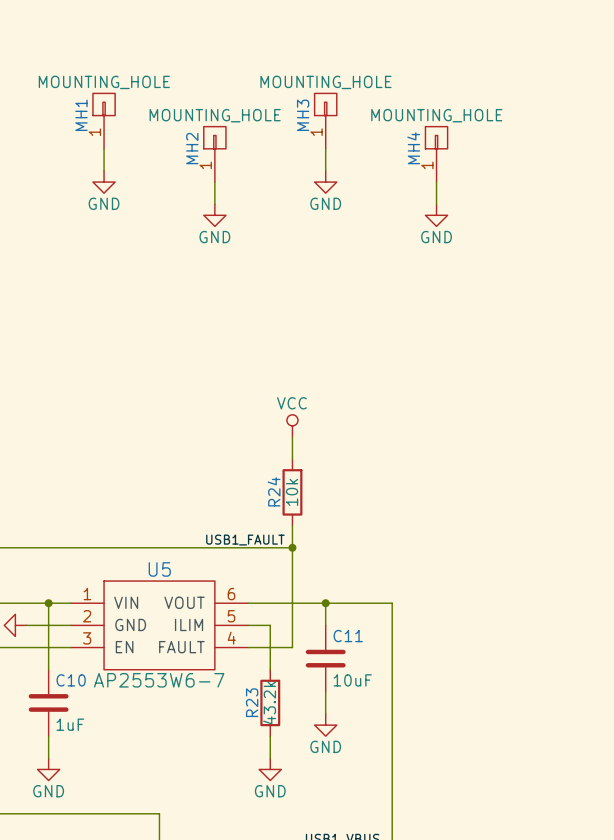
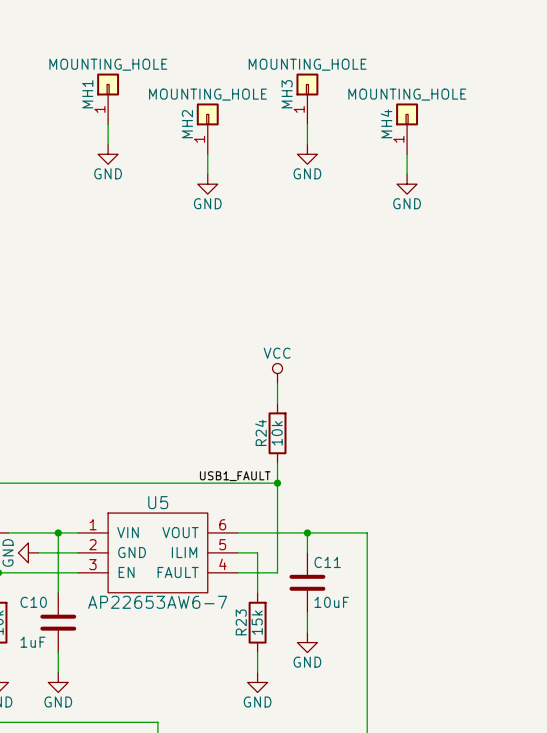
MH1 symbol: [92, 93, 116, 149] -> [97, 73, 120, 125]
MH3 symbol: [314, 93, 337, 149] -> [296, 73, 319, 125]
MH2 symbol: [203, 126, 226, 183] -> [196, 103, 219, 155]
MH4 symbol: [425, 126, 448, 183] -> [396, 103, 419, 155]
C10 name position: C10 (71, 680) -> C10 (33, 602)
U5 value: AP2553W6-7 (159, 680) -> AP22653AW6-7 (157, 602)
R23 value: 43.2k (269, 702) -> 15k (257, 622)
C10 value position: 1uF (70, 724) -> 1uF (32, 642)

